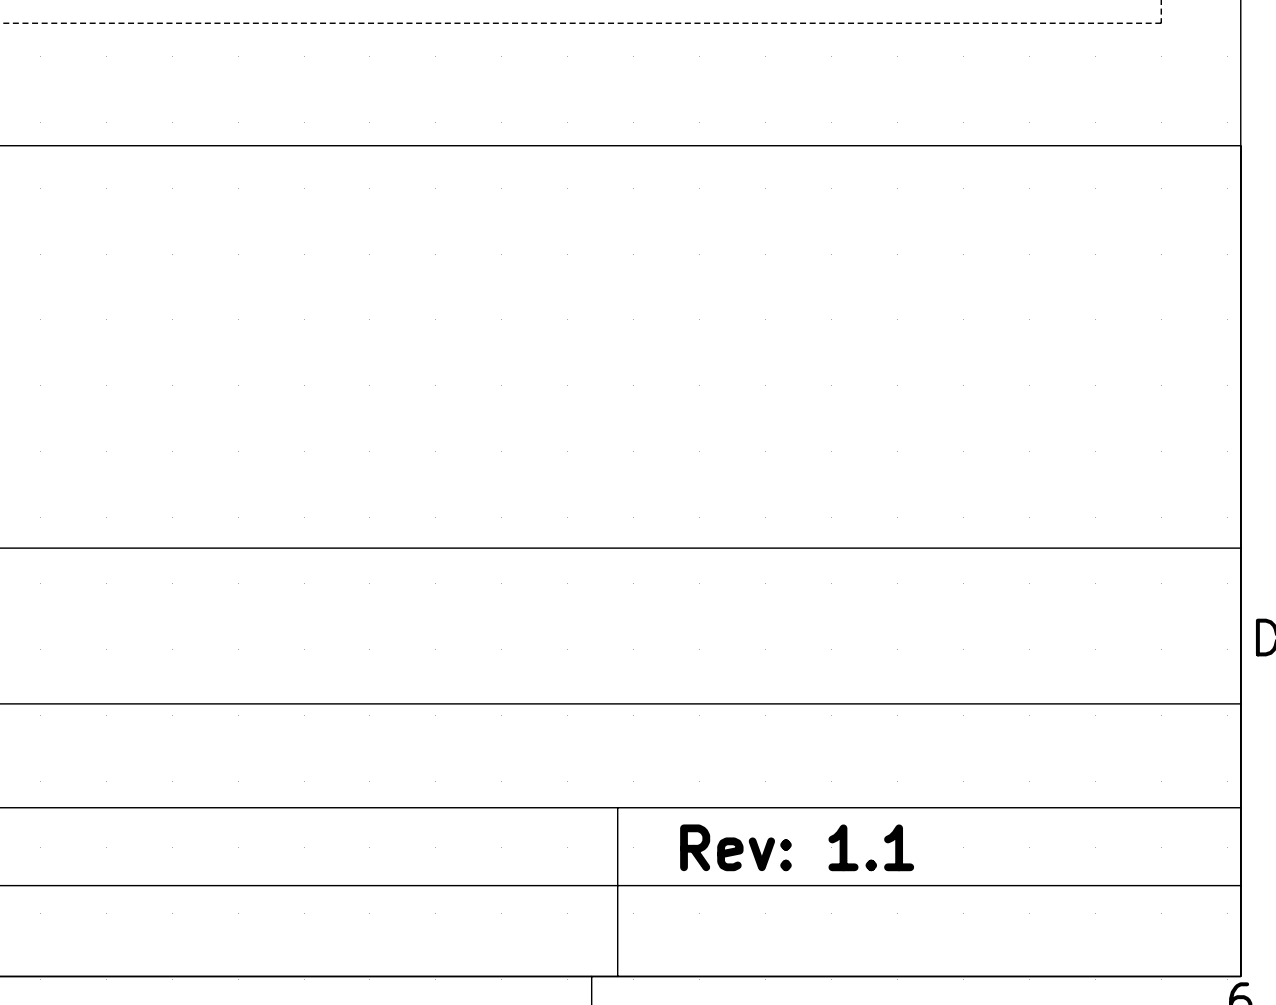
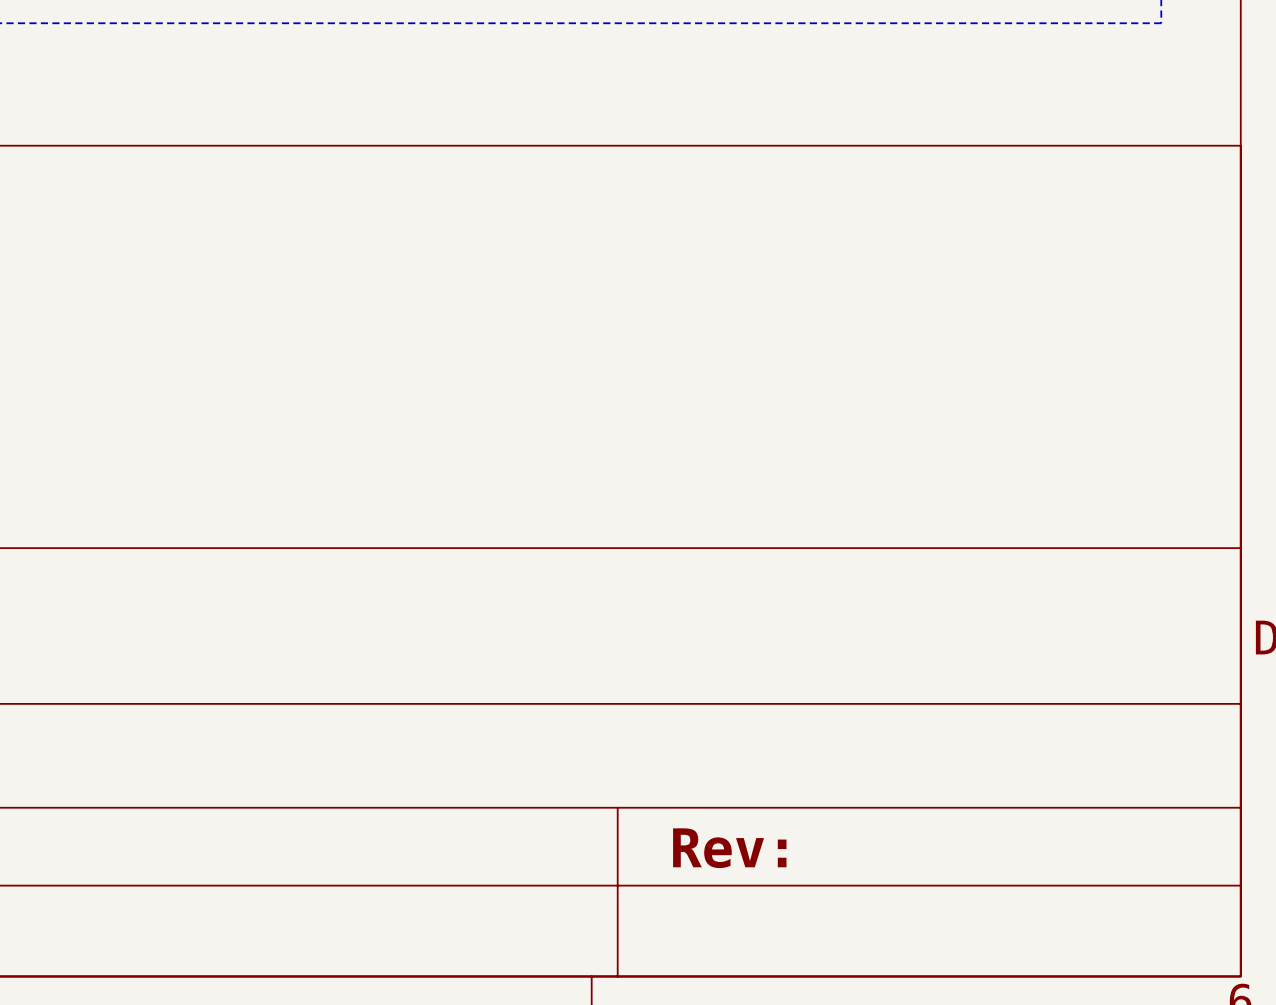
title block: Rev: 1.1 (797, 847) -> Rev: (729, 848)

